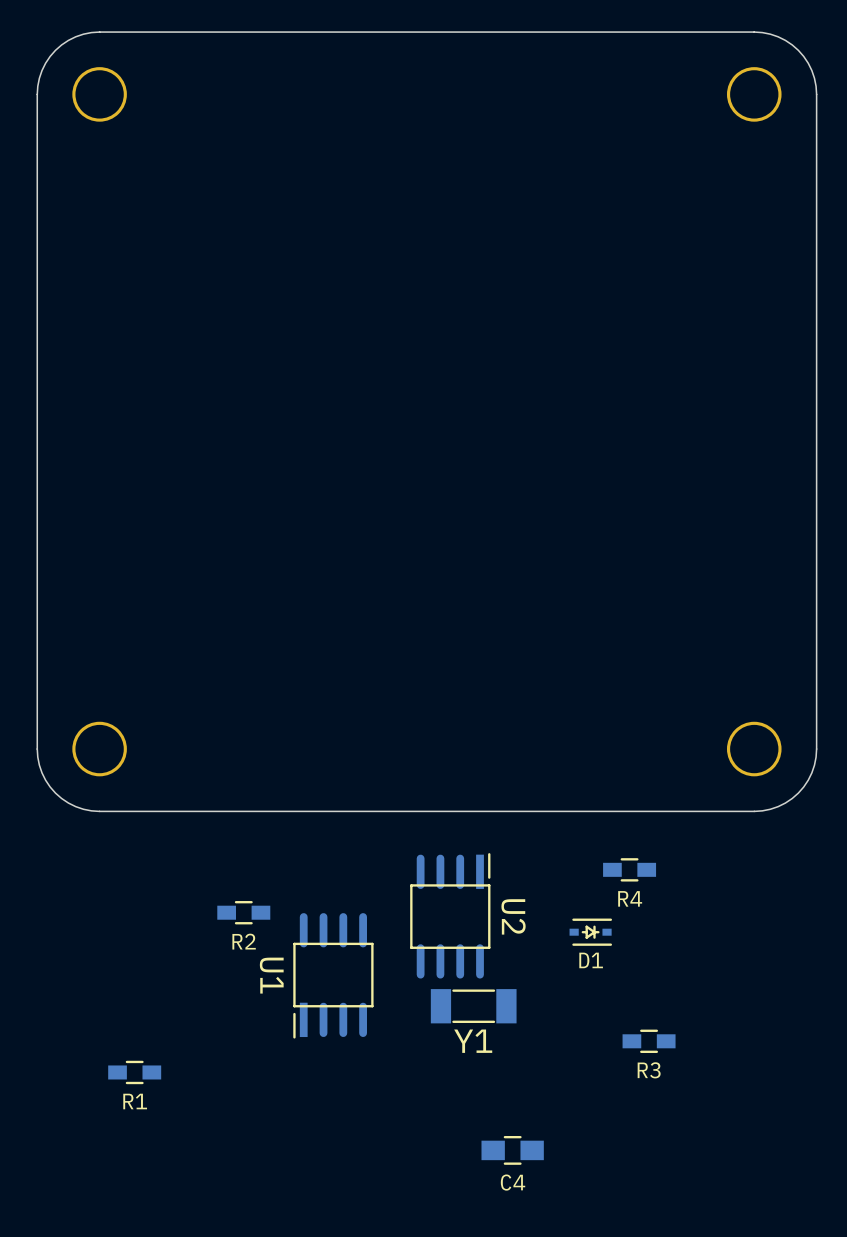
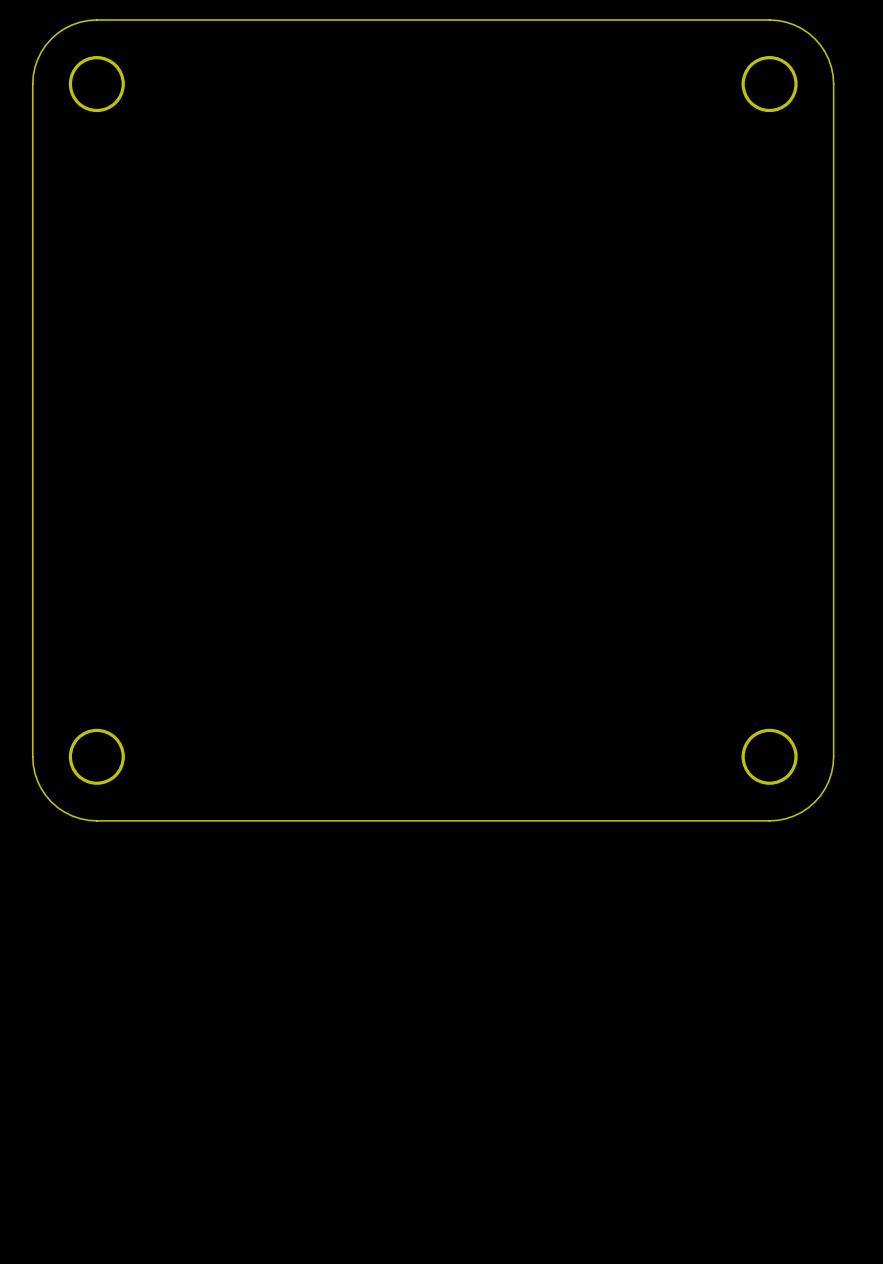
R4: (629, 869) -> none
R2: (243, 912) -> none
U2: (450, 915) -> none
D1: (590, 932) -> none
U1: (333, 975) -> none
Y1: (473, 1006) -> none
R3: (649, 1041) -> none
R1: (134, 1072) -> none
C4: (512, 1150) -> none

